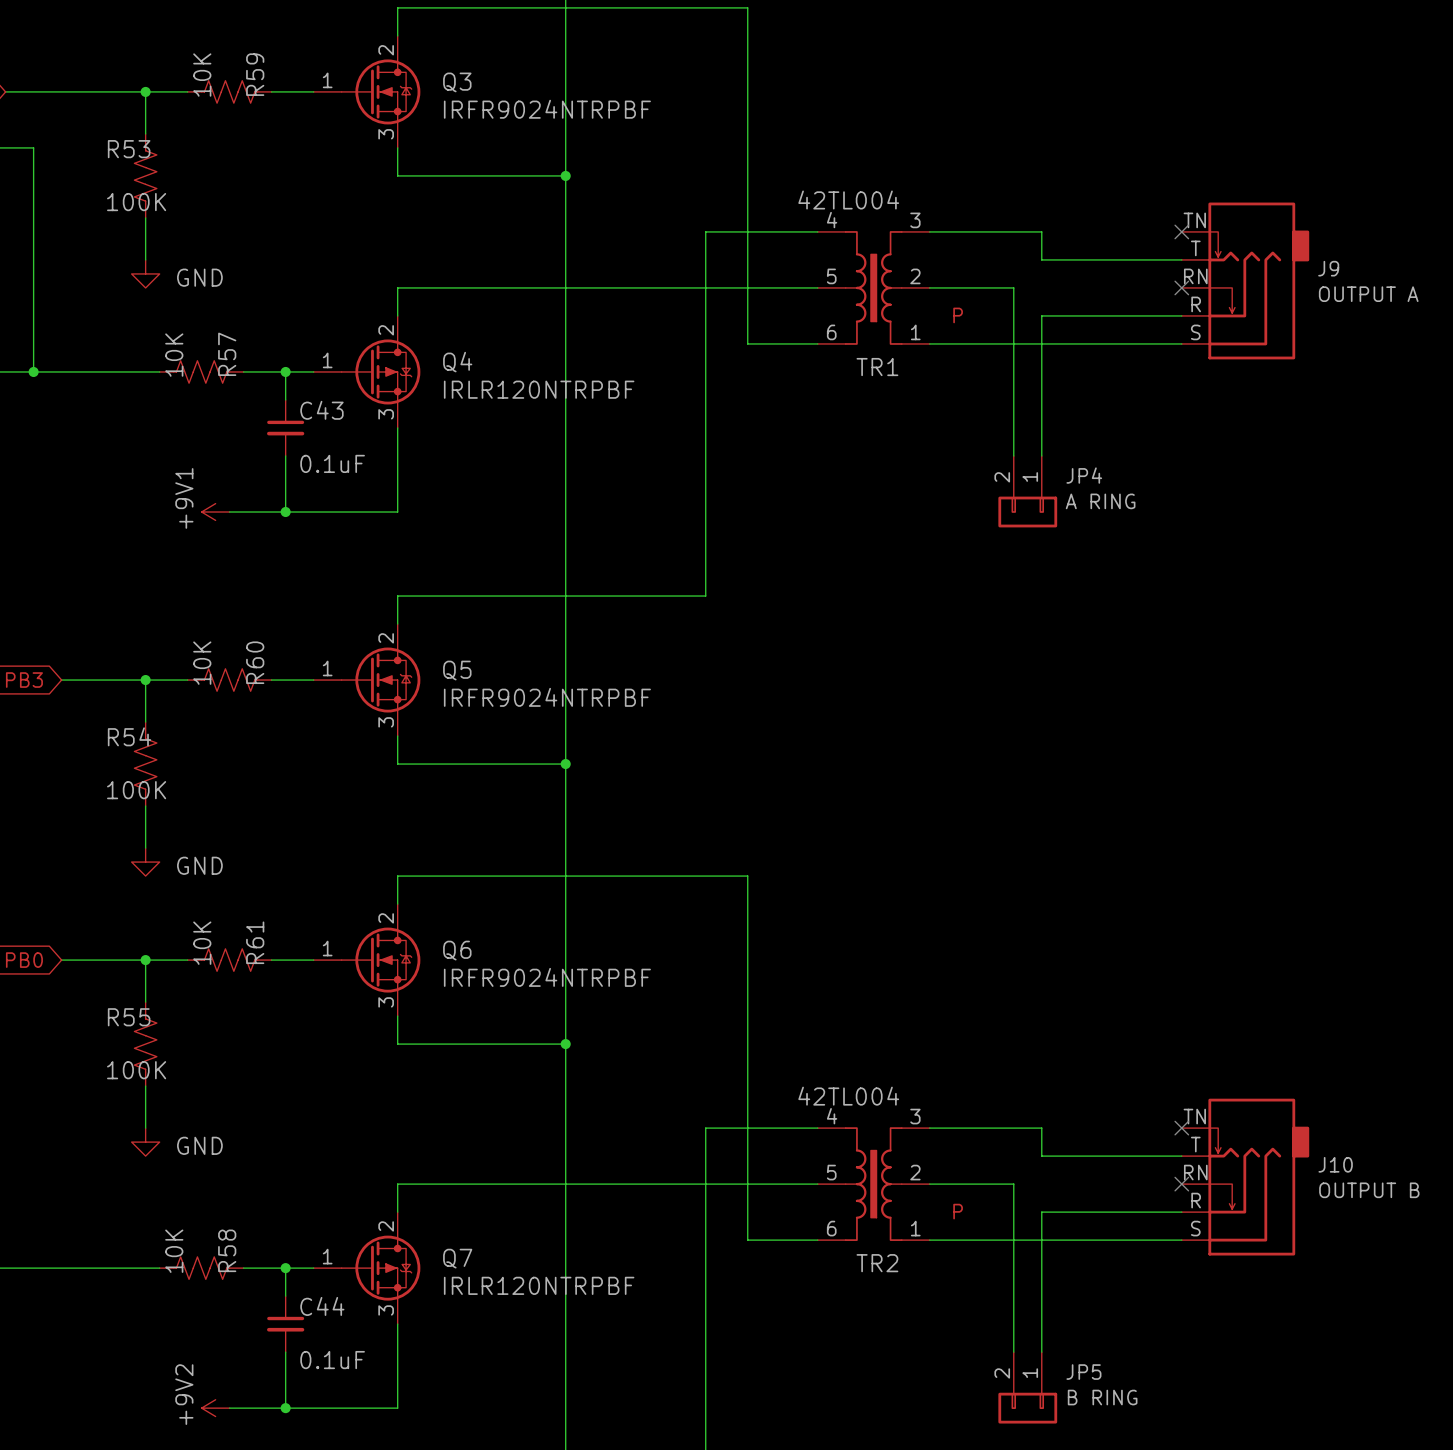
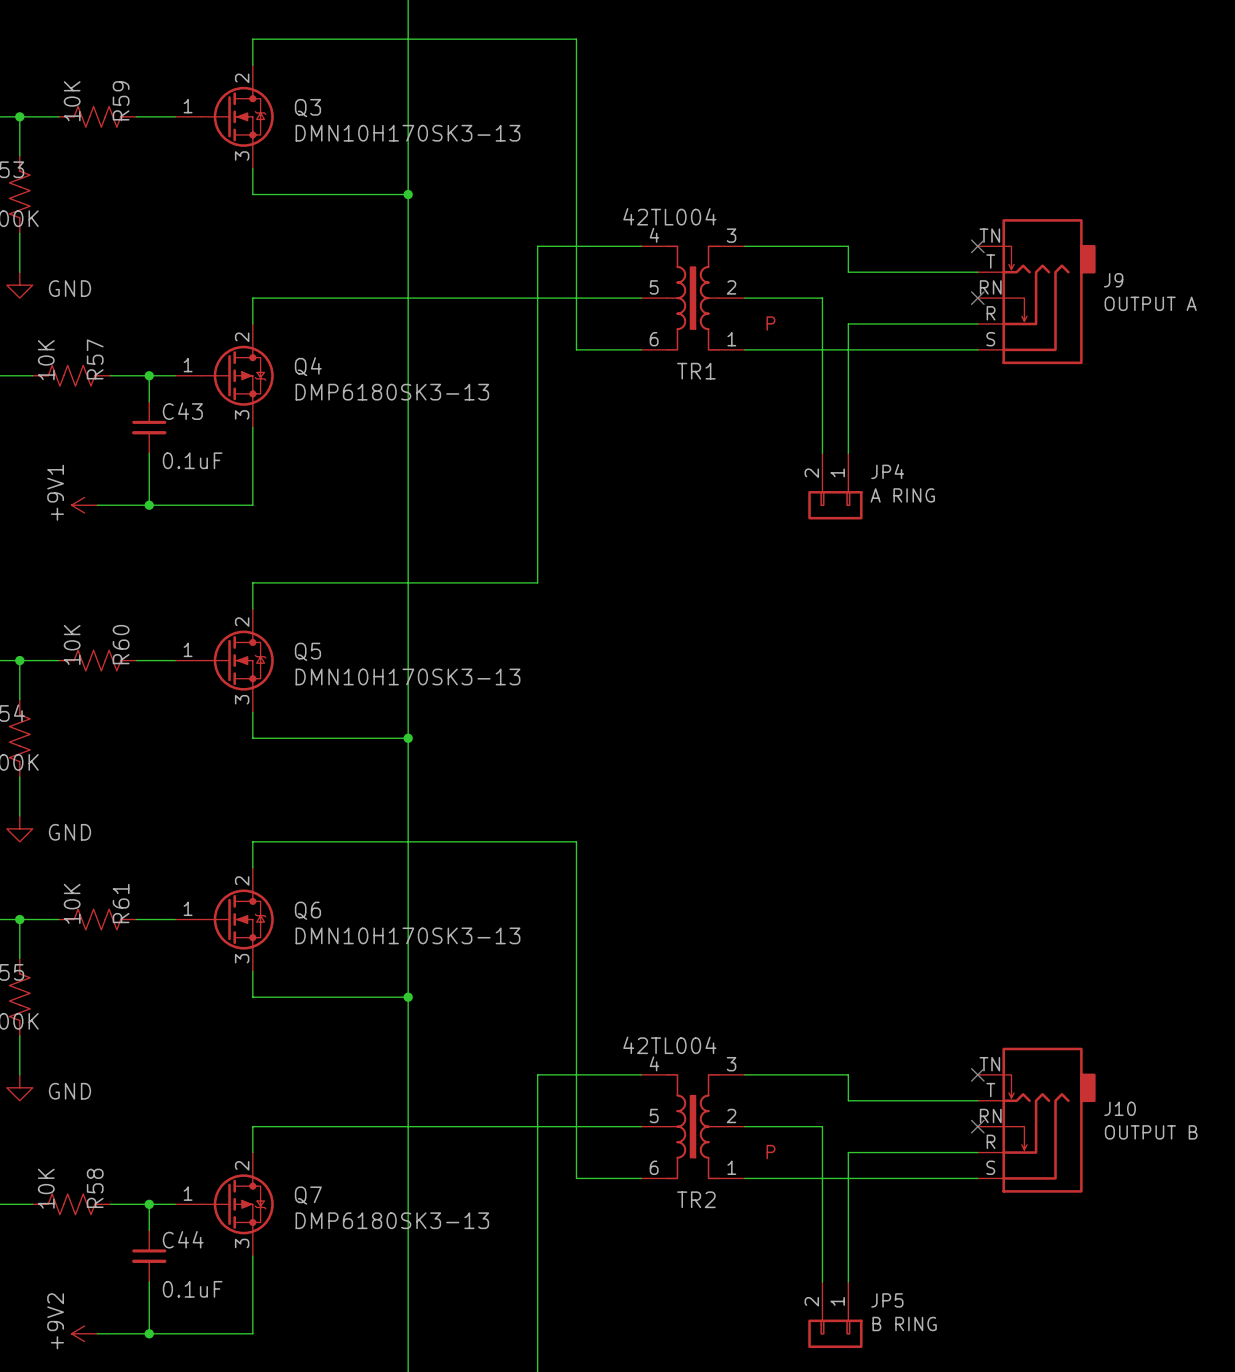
Q3 value: IRFR9024NTRPBF (547, 109) -> DMN10H170SK3-13 (407, 133)
Q4 value: IRLR120NTRPBF (539, 389) -> DMP6180SK3-13 (392, 392)
Q5 value: IRFR9024NTRPBF (547, 697) -> DMN10H170SK3-13 (407, 676)
Q6 value: IRFR9024NTRPBF (547, 977) -> DMN10H170SK3-13 (407, 935)
Q7 value: IRLR120NTRPBF (539, 1285) -> DMP6180SK3-13 (392, 1220)

